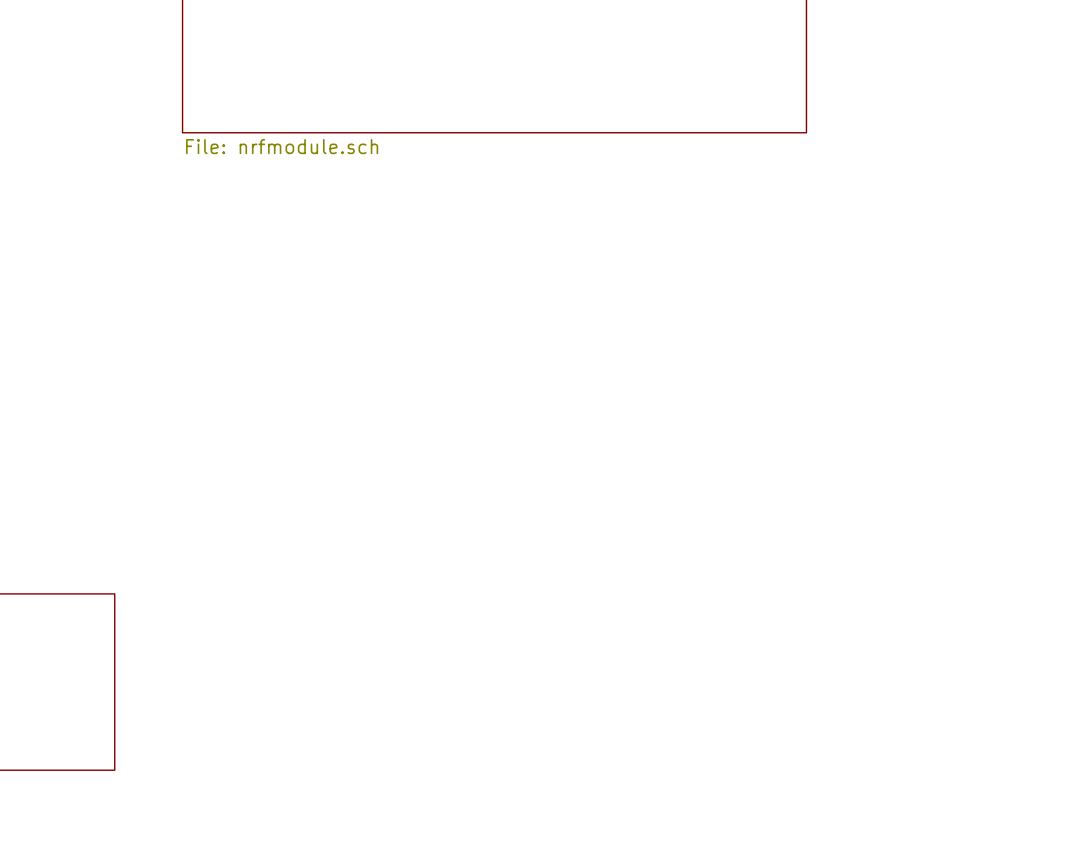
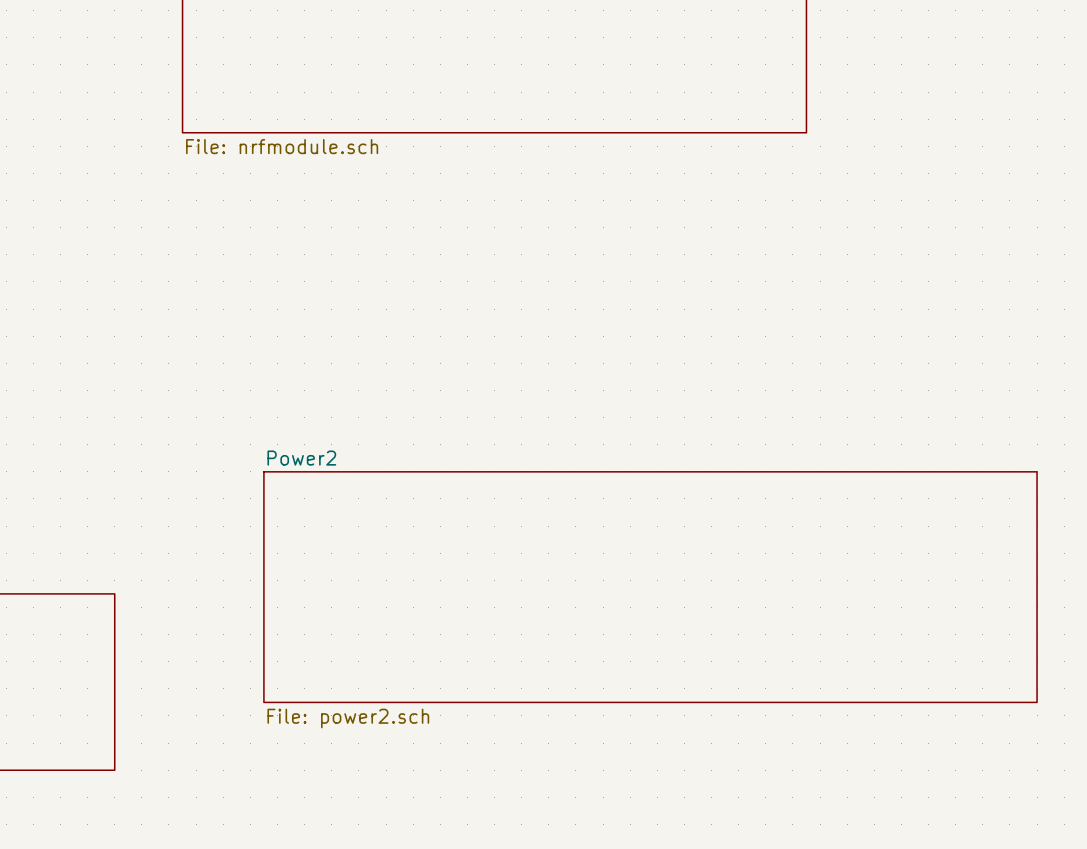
sheet Power2: none -> File: power2.sch (650, 587)

